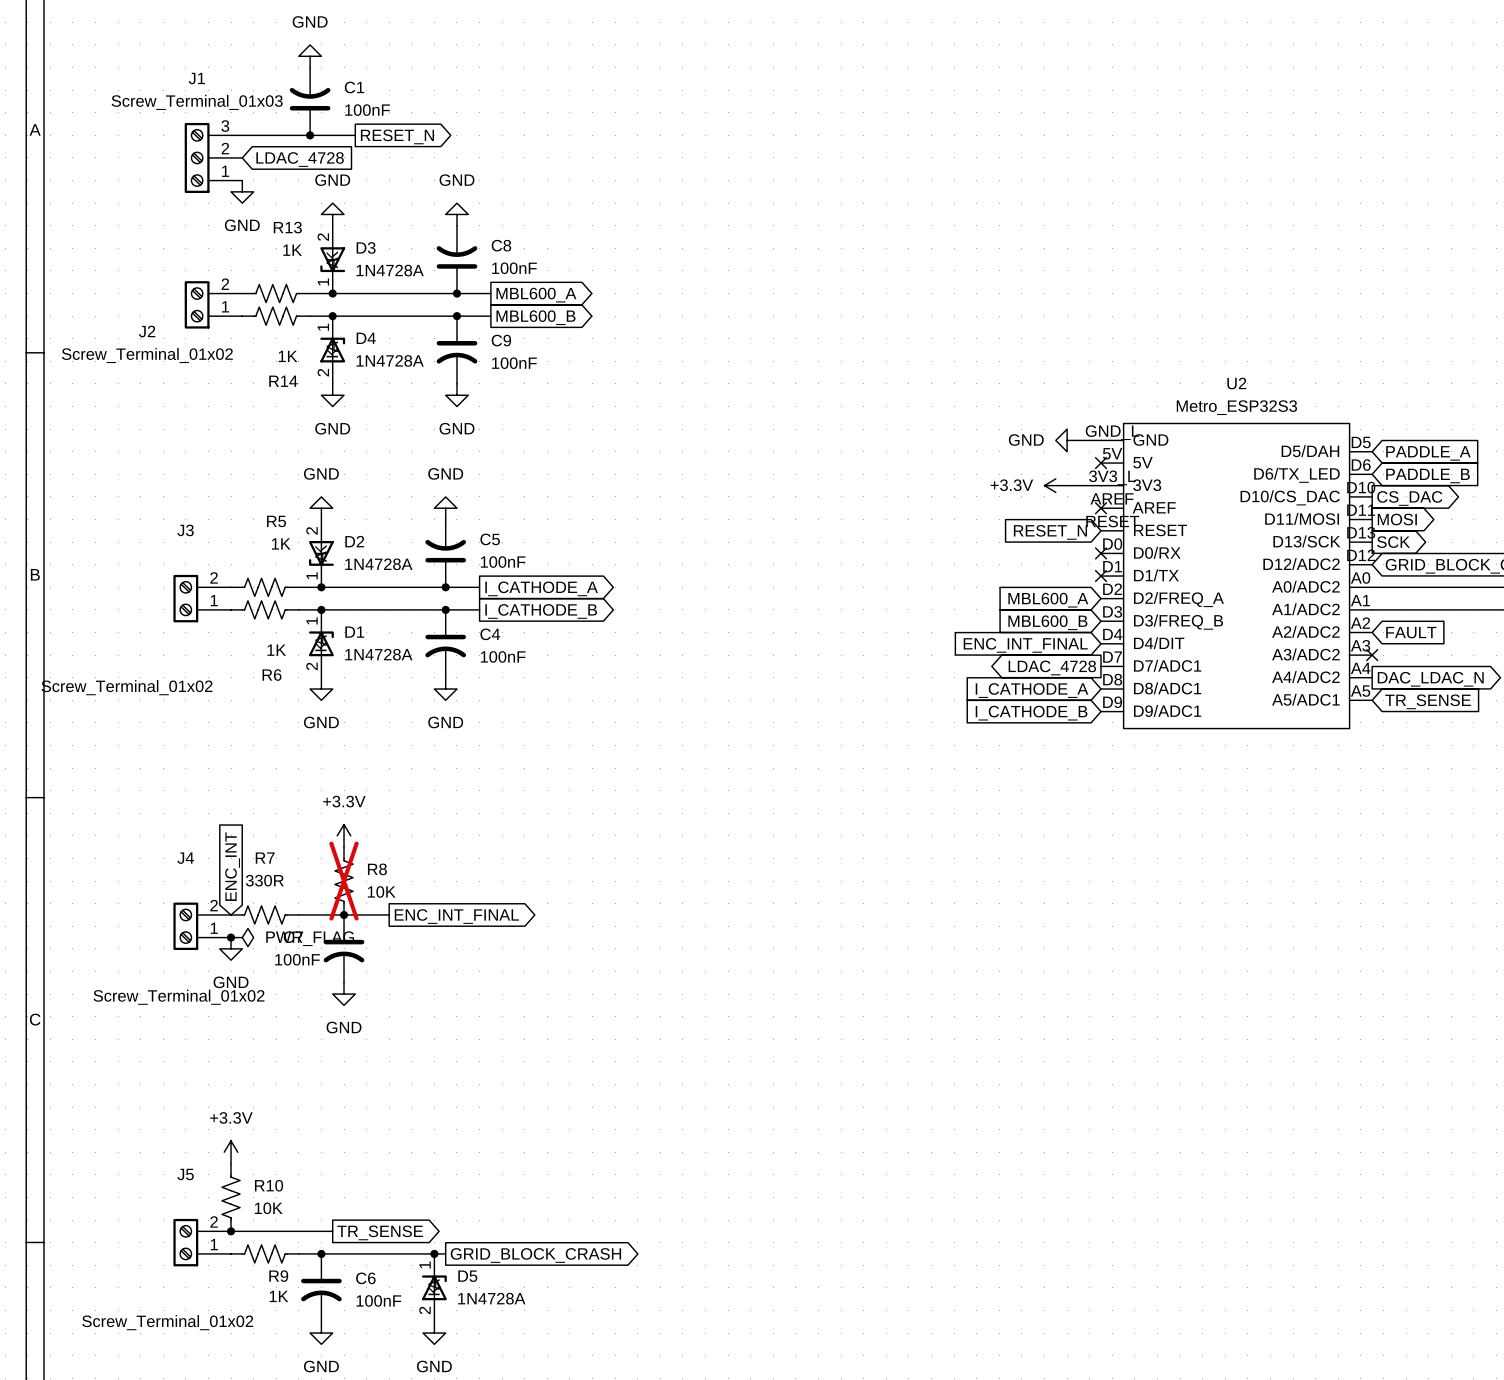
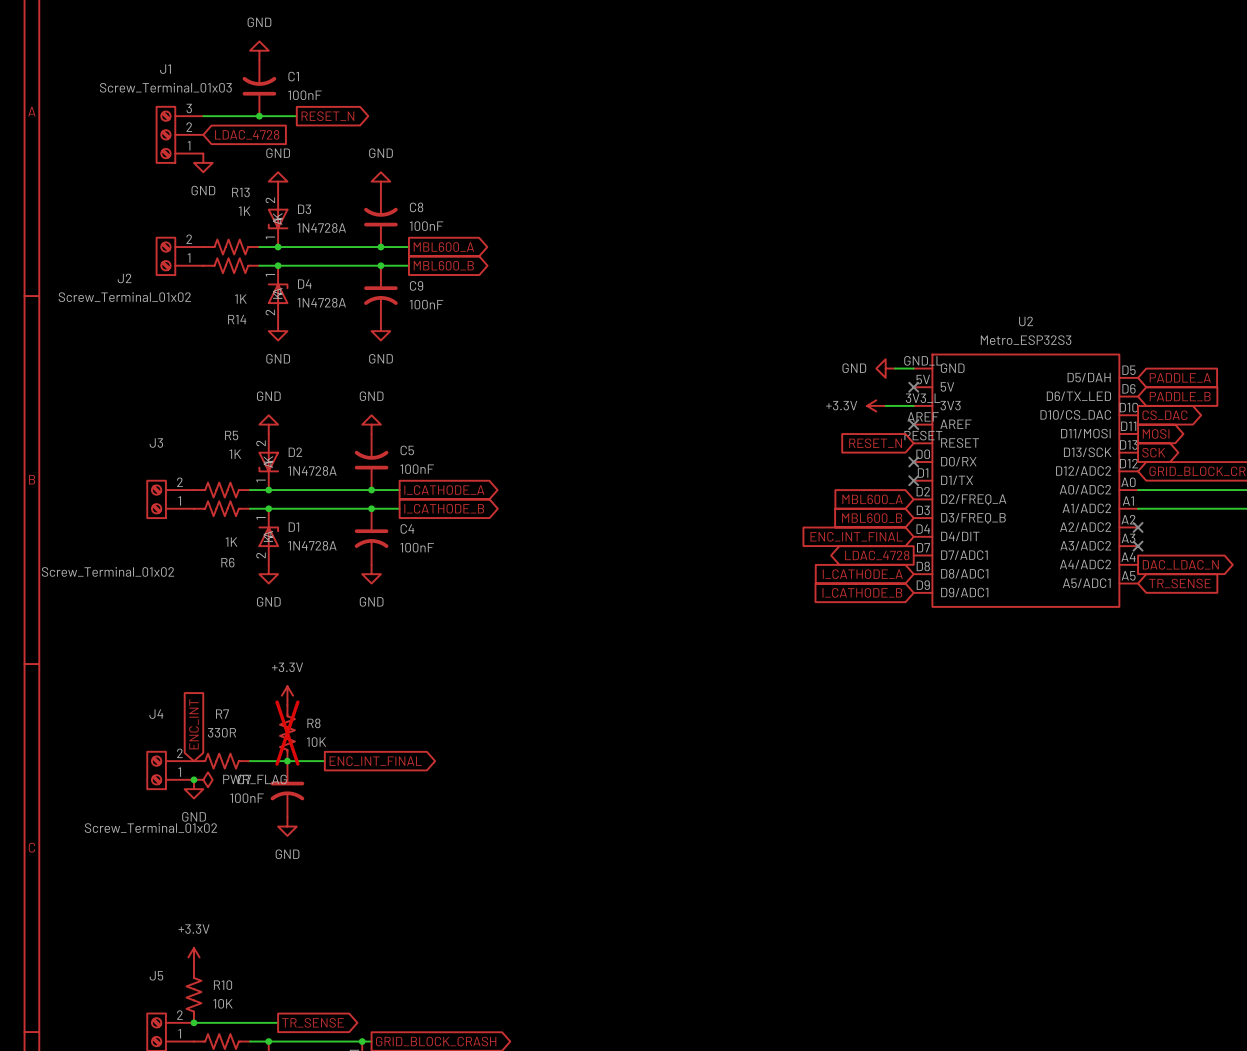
no-connect mark: none -> (1138, 527)
global label: FAULT (1411, 632) -> none

